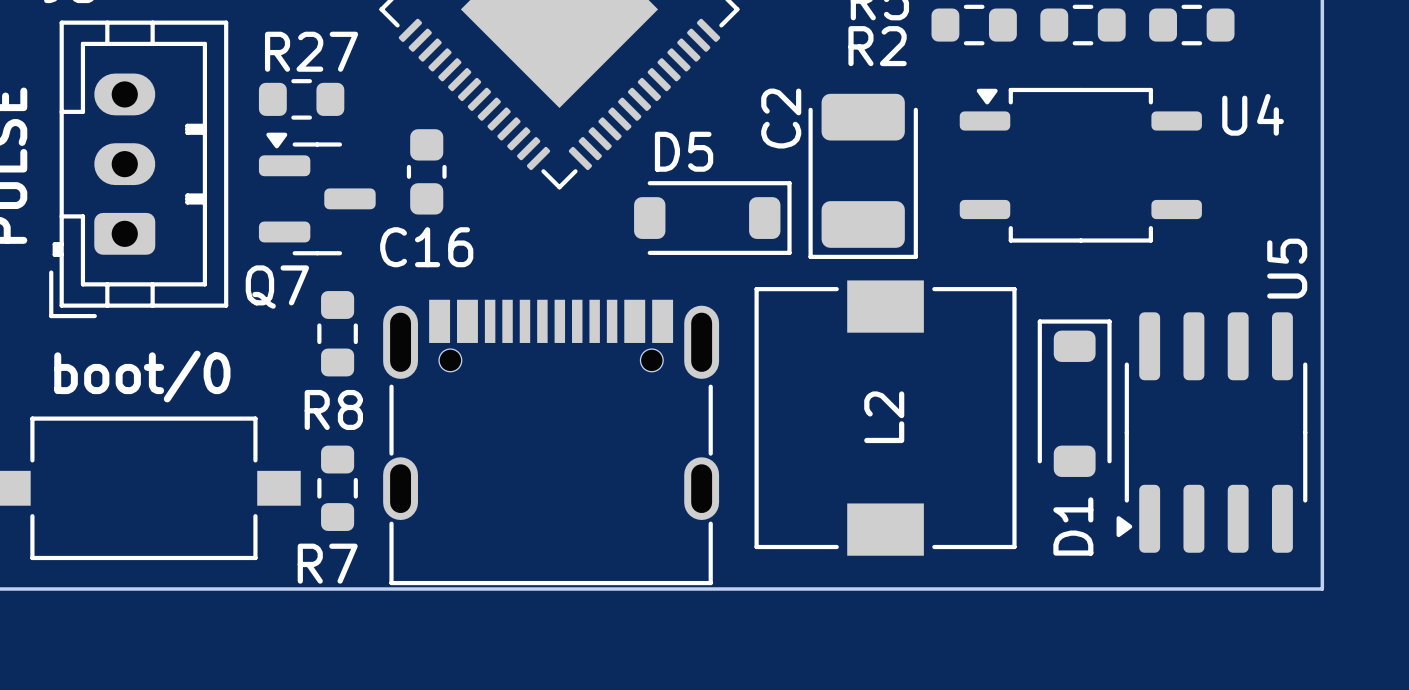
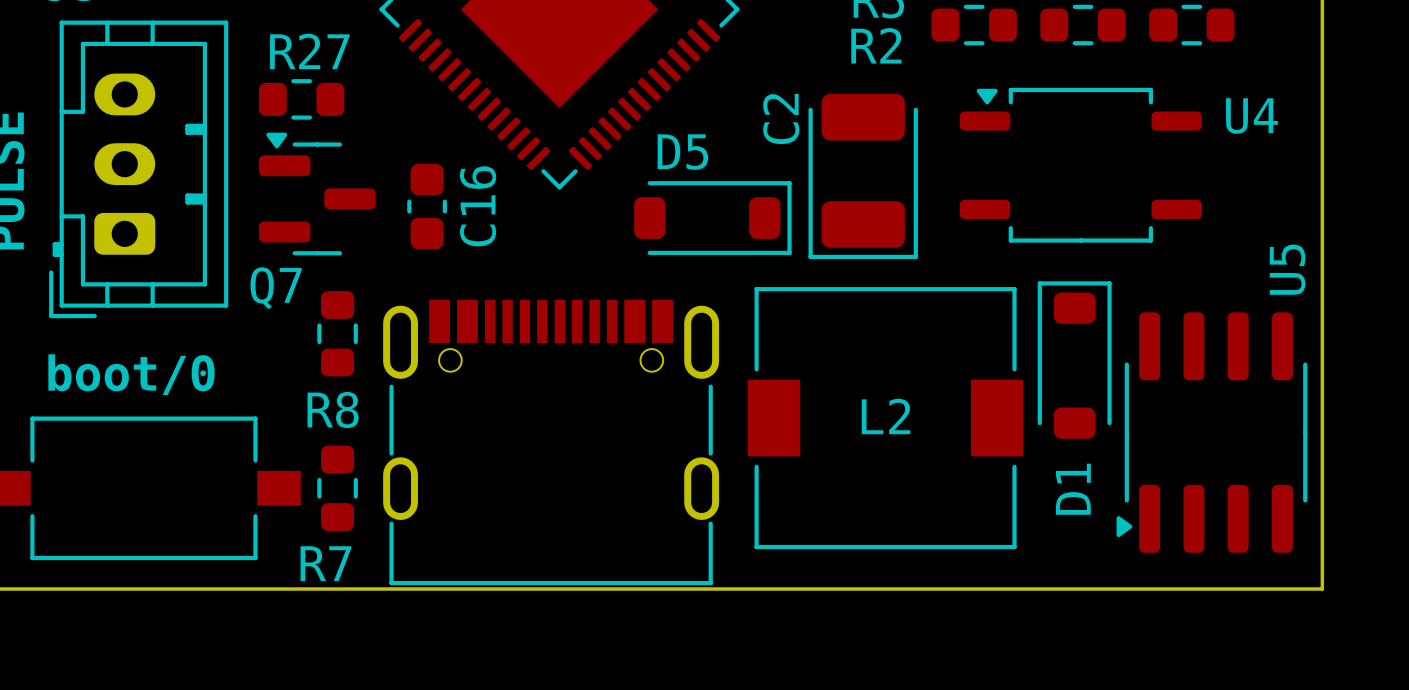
C16 position: (426, 171) -> (427, 206)
C16 name rotation: 0° (426, 247) -> 90° counterclockwise (478, 206)
D1 position: (1074, 398) -> (1074, 360)
L2 rotation: 0° (885, 418) -> 90° clockwise (885, 418)

